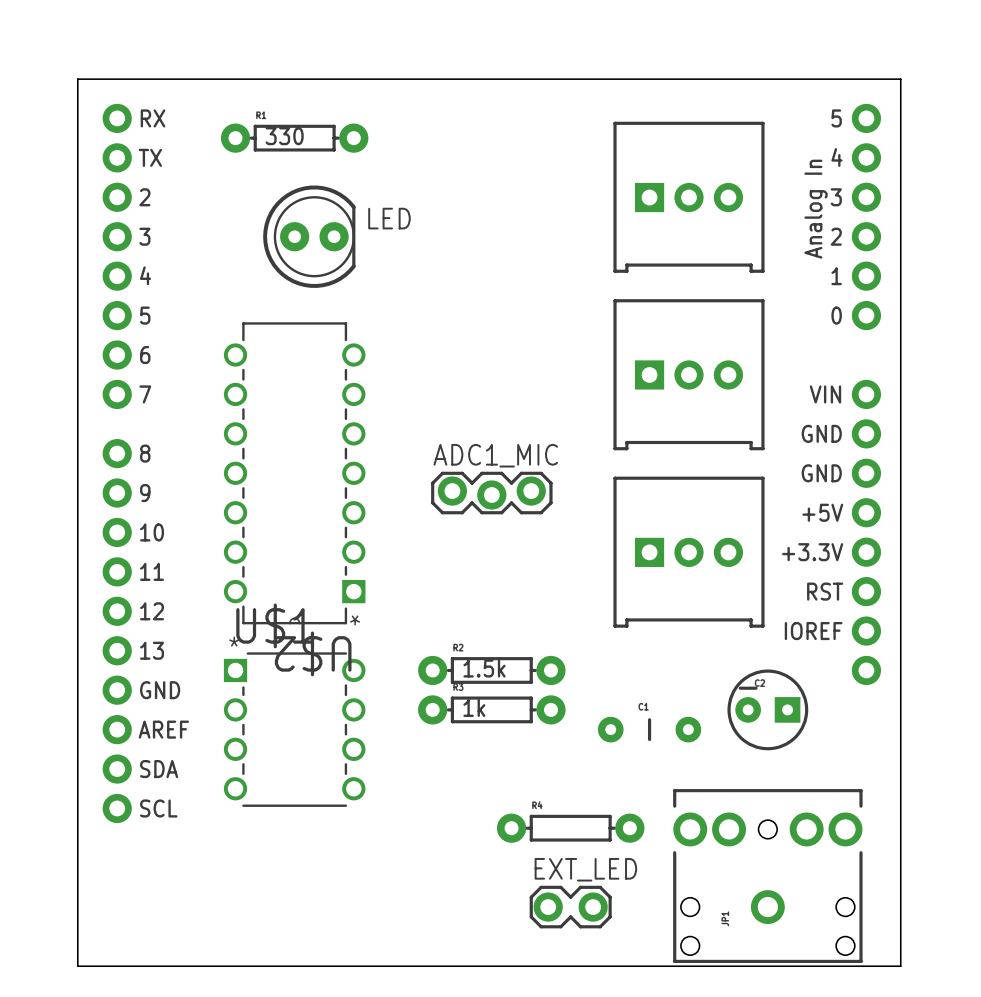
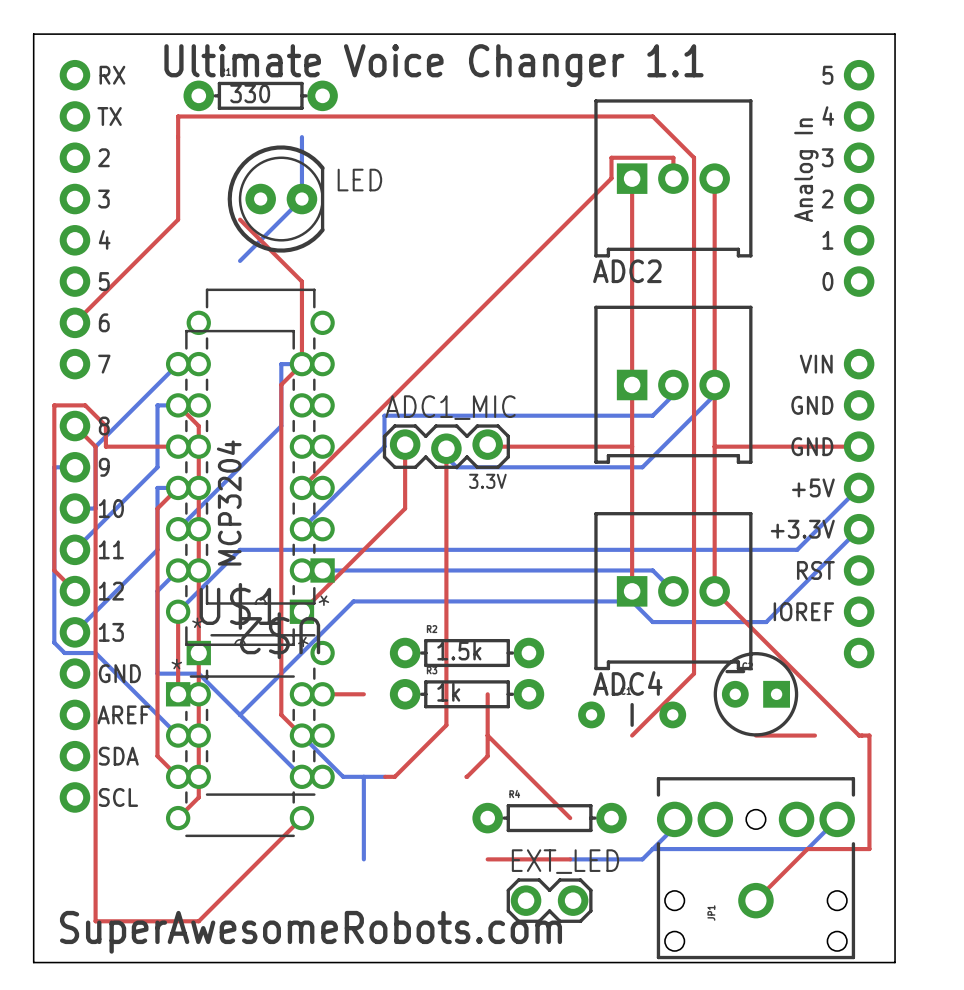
text: none -> Ultimate Voice Changer 1.1 (433, 65)
bottom track: none -> (301, 137) (301, 199) (240, 260)
part position: (688, 197) -> (673, 178)
top track: none -> (632, 178) (632, 591)
top track: none -> (673, 178) (673, 157) (611, 157) (611, 178) (301, 487)
top track: none -> (714, 178) (714, 591)
top track: none -> (240, 219) (301, 281) (301, 364) (281, 384) (281, 714) (301, 735)
text: none -> ADC2 (627, 271)
top track: none -> (74, 322) (178, 219) (178, 116) (652, 116) (694, 157) (694, 673) (632, 735)
part position: (688, 374) -> (673, 384)
bottom track: none -> (178, 364) (95, 446) (95, 508) (74, 508)
bottom track: none -> (301, 364) (281, 364) (281, 426) (178, 529)
bottom track: none -> (673, 385) (673, 395) (652, 415) (384, 415) (384, 446) (301, 529)
bottom track: none -> (714, 385) (714, 395) (642, 467) (456, 467) (446, 456) (446, 448)
bottom track: none -> (178, 405) (157, 405) (157, 467) (74, 549)
top track: none -> (178, 405) (198, 426) (198, 797) (178, 818)
top track: none -> (74, 426) (95, 446) (95, 921) (198, 921) (301, 818)
top track: none -> (405, 444) (405, 508) (301, 611)
top track: none -> (487, 444) (487, 446) (632, 446)
top track: none -> (178, 446) (105, 446) (105, 426) (85, 405) (54, 405) (54, 570) (74, 591)
top track: none -> (714, 446) (859, 446)
top track: none -> (446, 448) (446, 725) (394, 776) (385, 776)
bottom track: none -> (74, 467) (54, 467) (54, 642) (64, 653) (95, 653) (178, 735)
ADC1_MIC position: (491, 493) -> (446, 446)
text: none -> 3.3V (487, 481)
bottom track: none -> (178, 487) (157, 487) (157, 549) (74, 632)
top track: none -> (178, 487) (157, 508) (157, 756) (178, 776)
part: none -> (240, 487)
bottom track: none -> (859, 487) (797, 549) (240, 549) (178, 611)
text: none -> MCP3204 (229, 502)
part position: (688, 552) -> (673, 591)
bottom track: none -> (859, 529) (766, 622) (652, 622) (632, 601)
bottom track: none -> (178, 570) (157, 591) (157, 673) (198, 673) (301, 776)
bottom track: none -> (301, 570) (652, 570) (673, 591)
top track: none -> (714, 591) (859, 735) (869, 735) (869, 849) (807, 849) (755, 900)
bottom track: none -> (632, 601) (353, 601) (240, 714)
top track: none -> (178, 611) (178, 694)
text: none -> ADC4 (627, 683)
top track: none -> (301, 694) (363, 694)
top track: none -> (487, 694) (487, 756) (466, 776)
bottom track: none -> (301, 735) (343, 776) (385, 776)
top track: none -> (487, 735) (570, 818)
top track: none -> (755, 735) (814, 735)
part: none -> (240, 756)
bottom track: none -> (363, 776) (363, 859)
bottom track: none -> (674, 819) (673, 828) (642, 859) (570, 859)
bottom track: none -> (837, 819) (807, 849) (652, 849)
top track: none -> (487, 859) (570, 859)
text: none -> SuperAwesomeRobots.com (310, 932)

